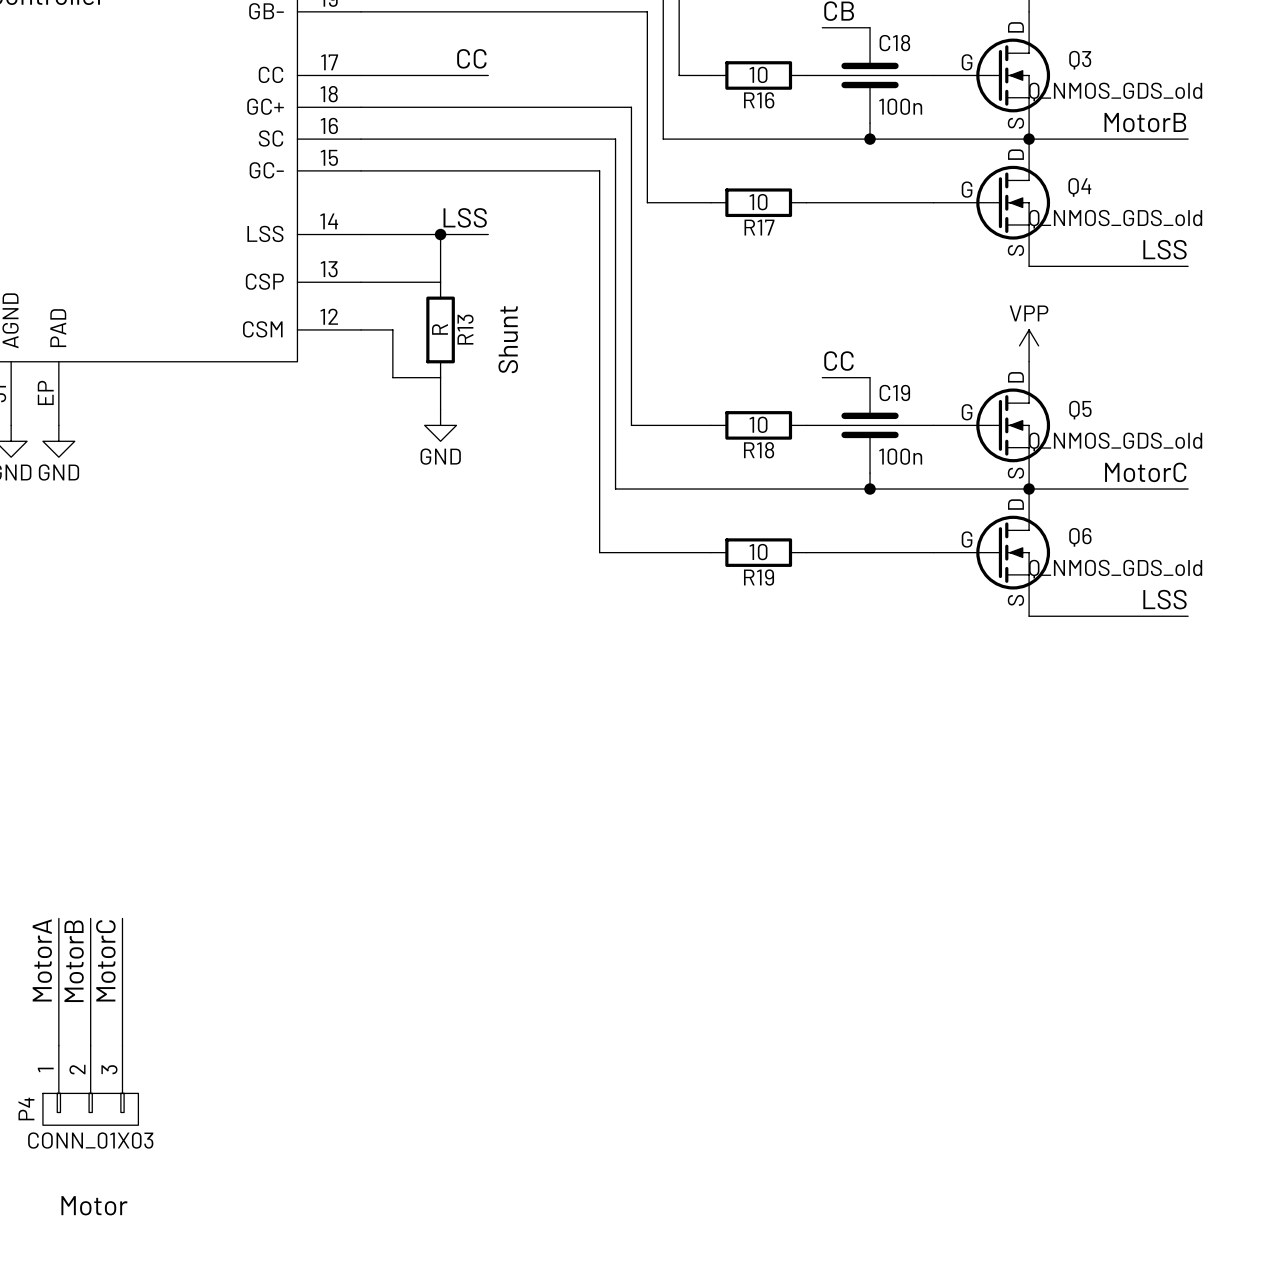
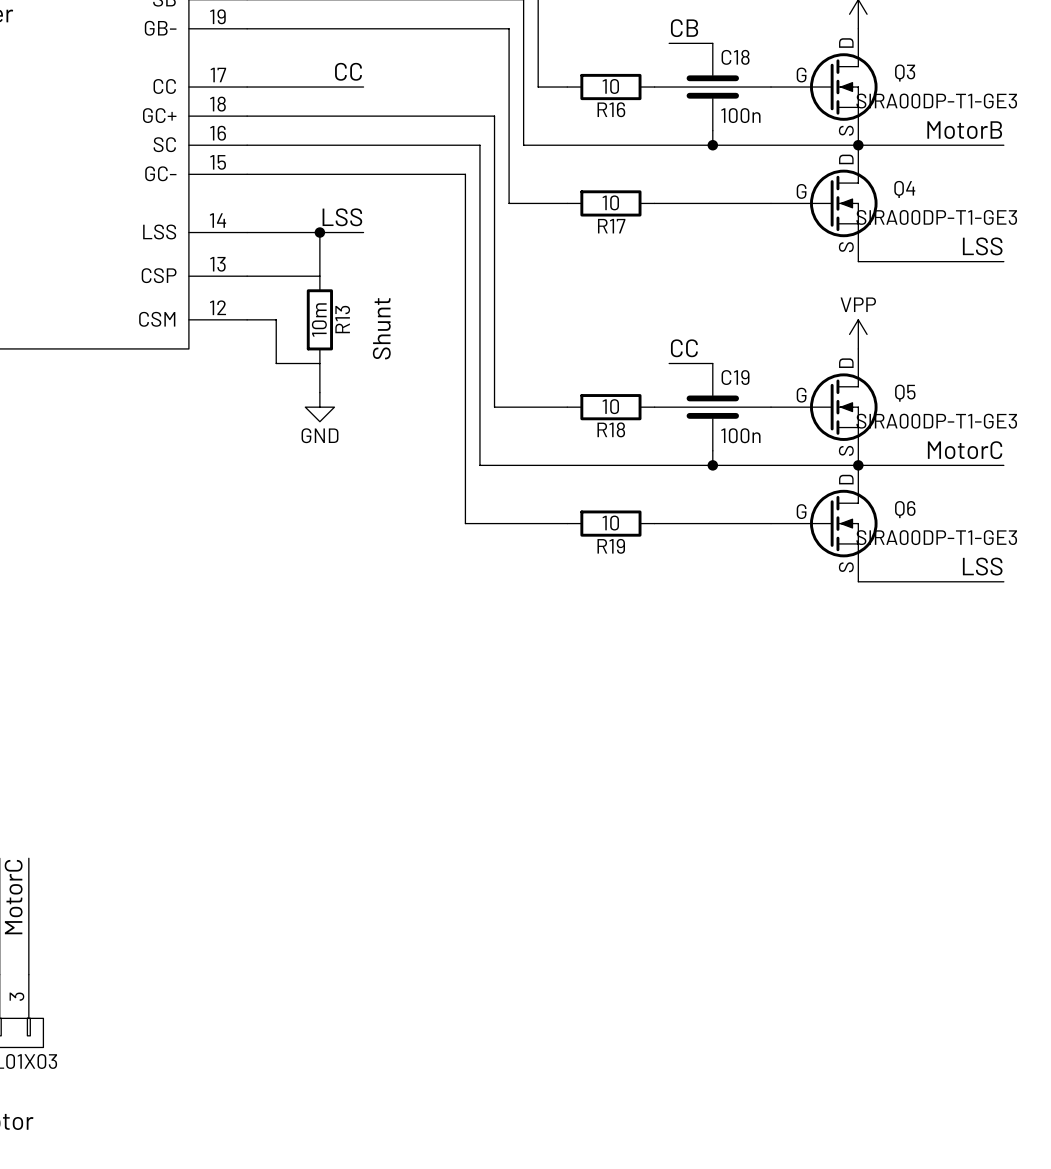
Q3 value: Q_NMOS_GDS_old (1115, 92) -> SIRA00DP-T1-GE3 (936, 101)
Q4 value: Q_NMOS_GDS_old (1115, 219) -> SIRA00DP-T1-GE3 (936, 217)
R13 value: R (439, 329) -> 10m (319, 320)
Q5 value: Q_NMOS_GDS_old (1115, 441) -> SIRA00DP-T1-GE3 (936, 421)
Q6 value: Q_NMOS_GDS_old (1115, 569) -> SIRA00DP-T1-GE3 (936, 537)

